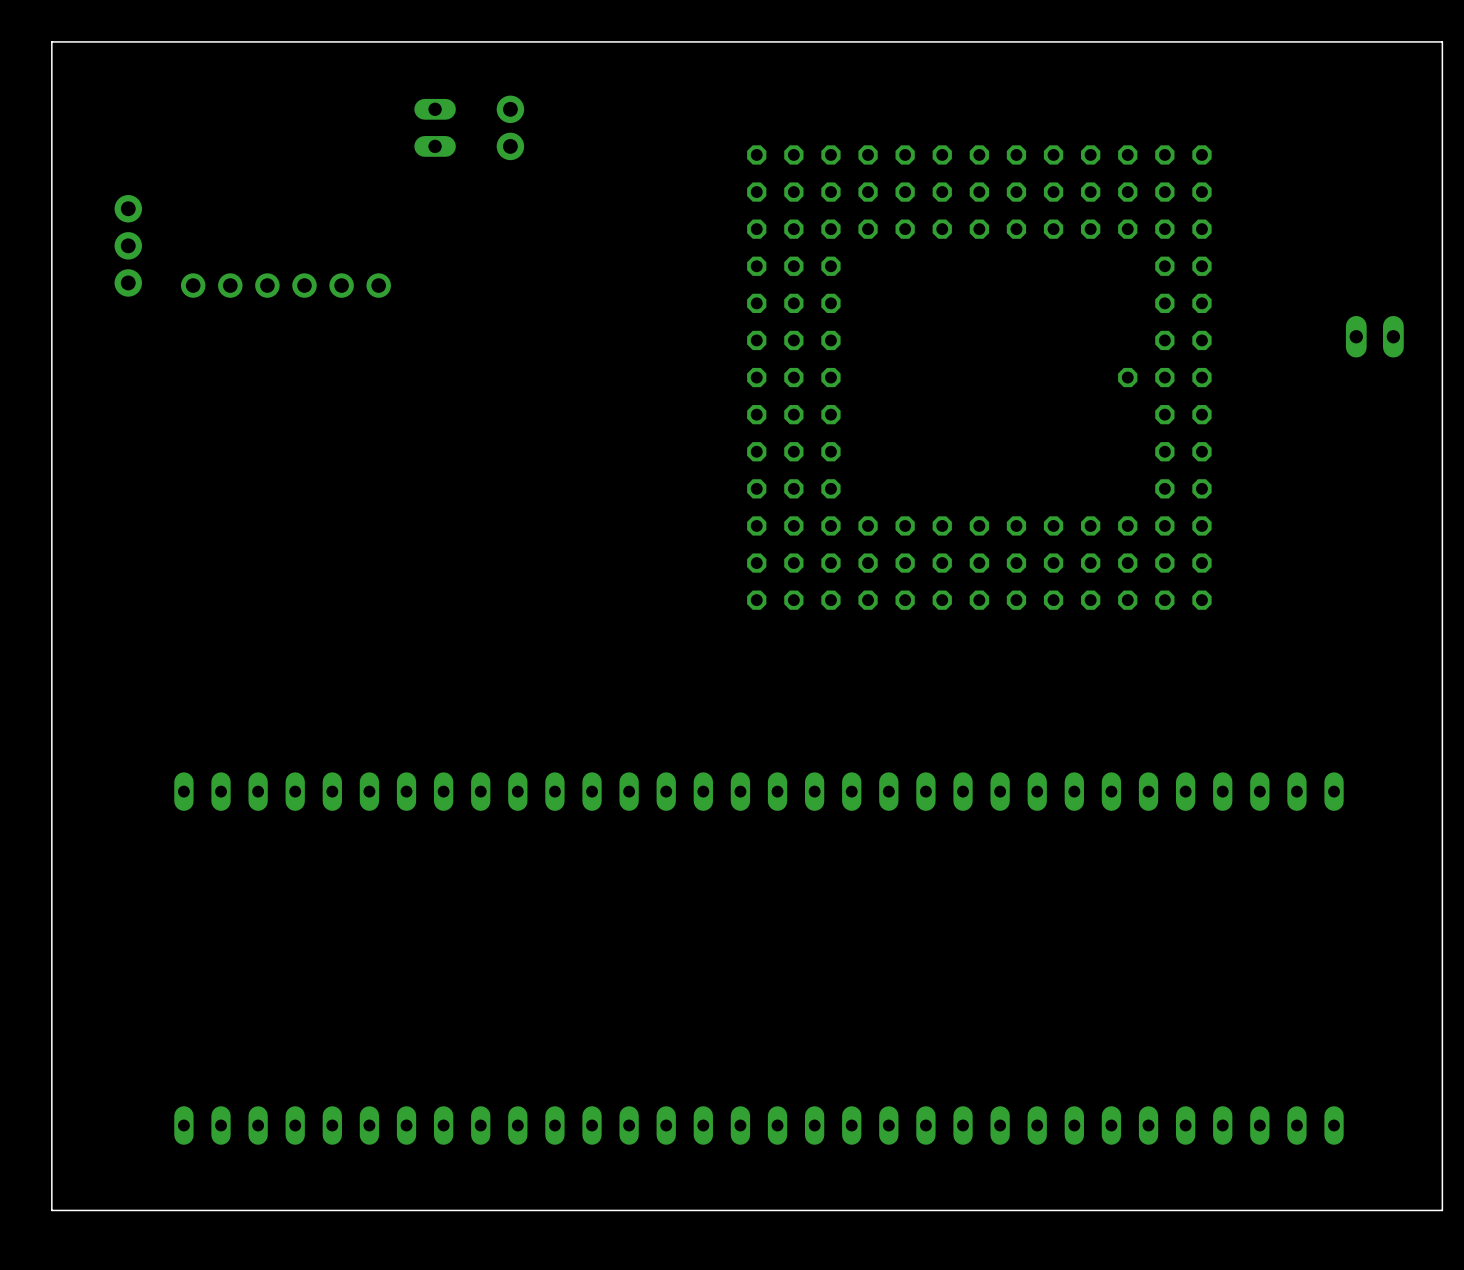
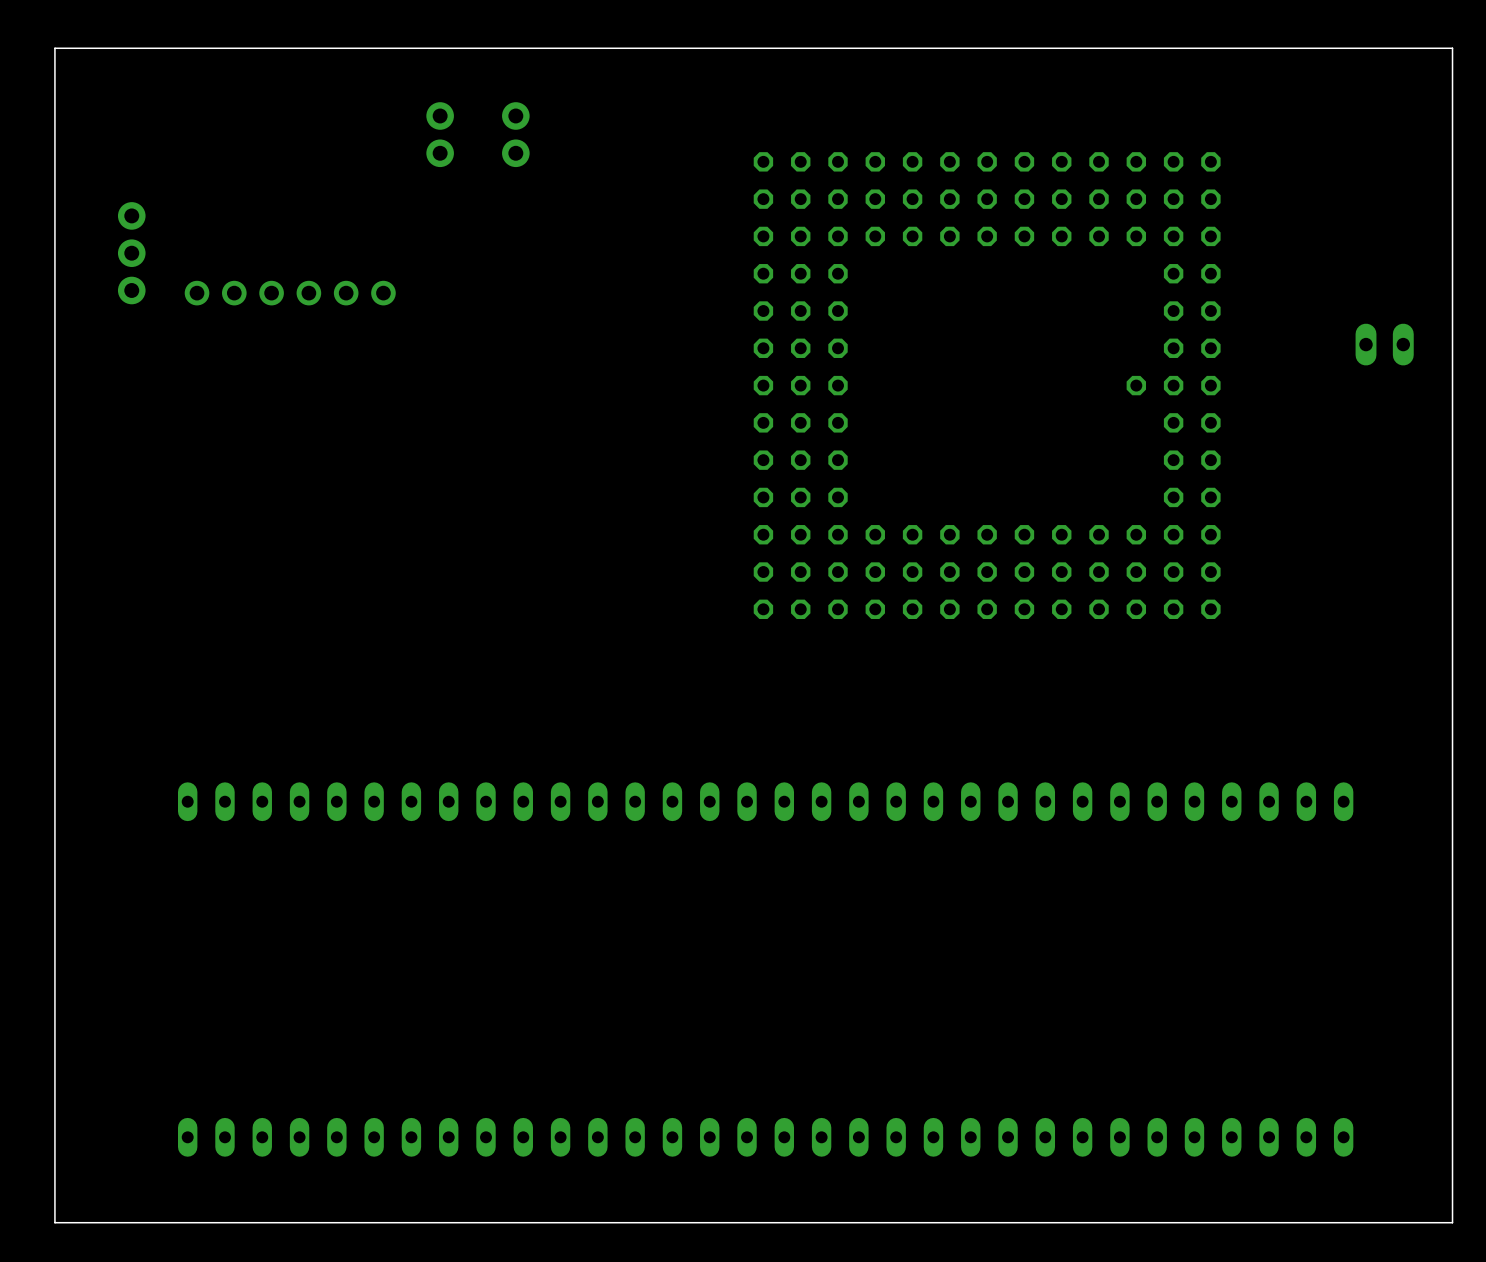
part footprint: [414, 98, 456, 157] -> [426, 102, 454, 168]

